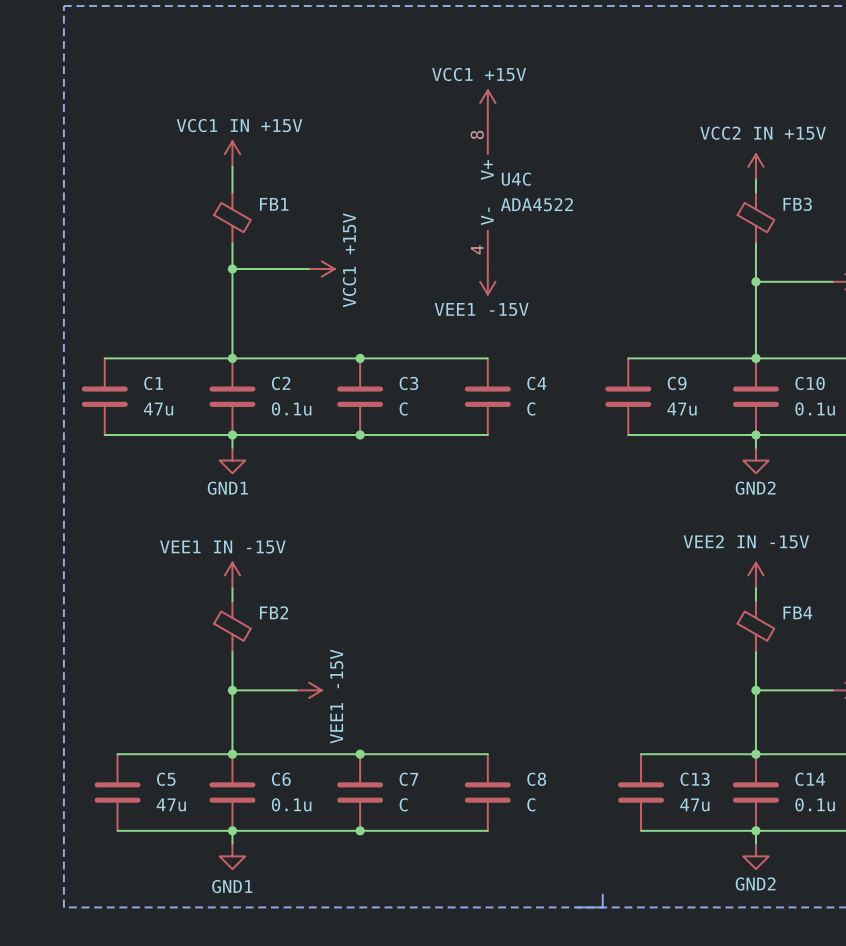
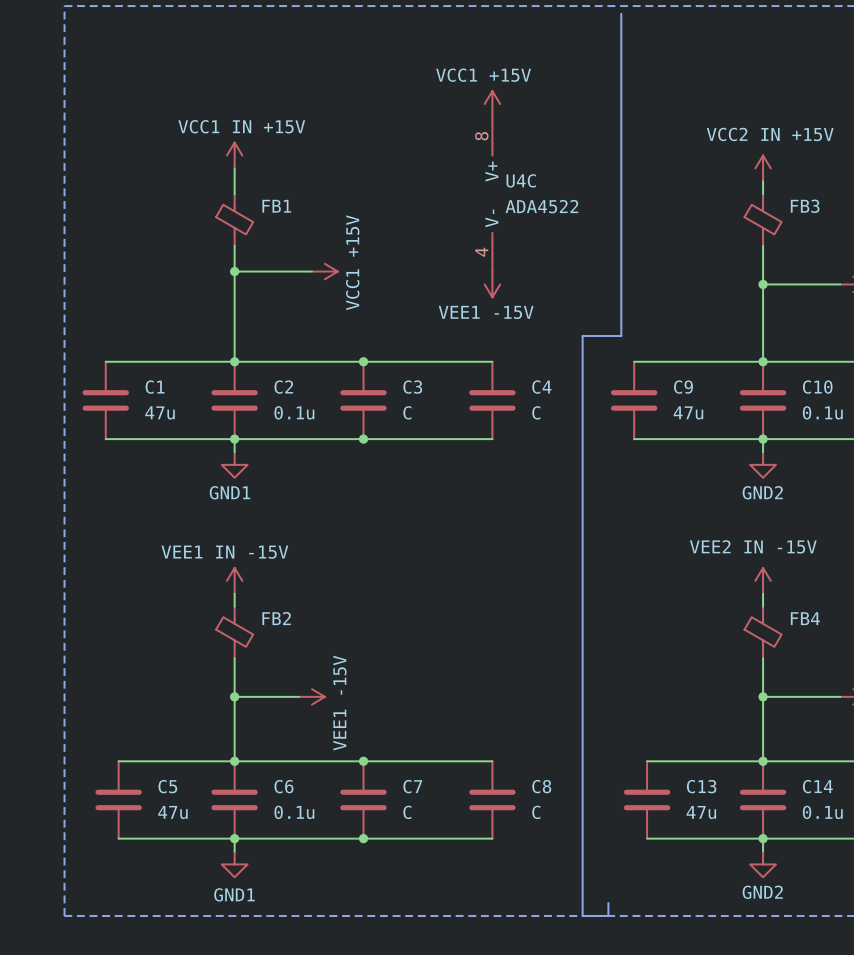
line: none -> (621, 13) (621, 335) (582, 335) (582, 915)

